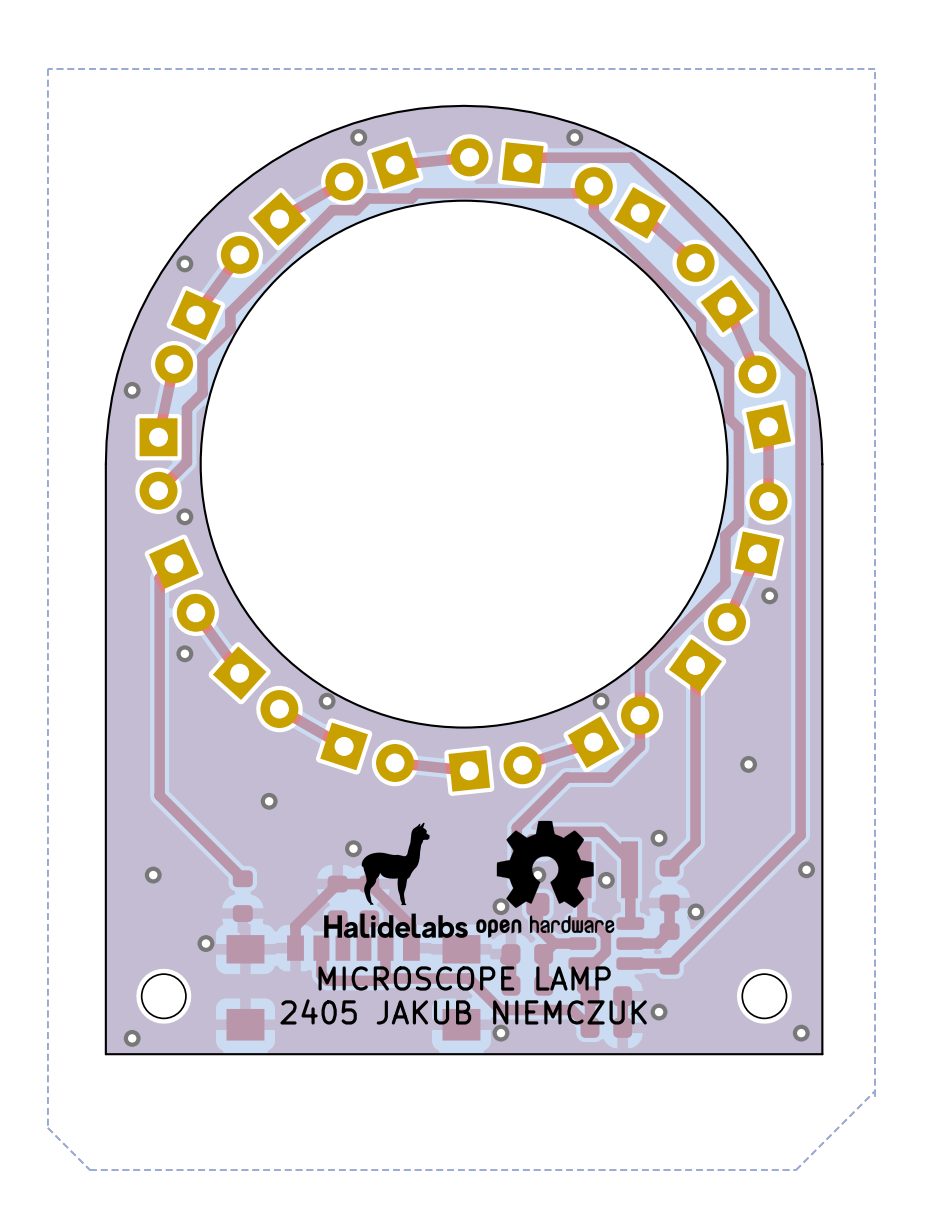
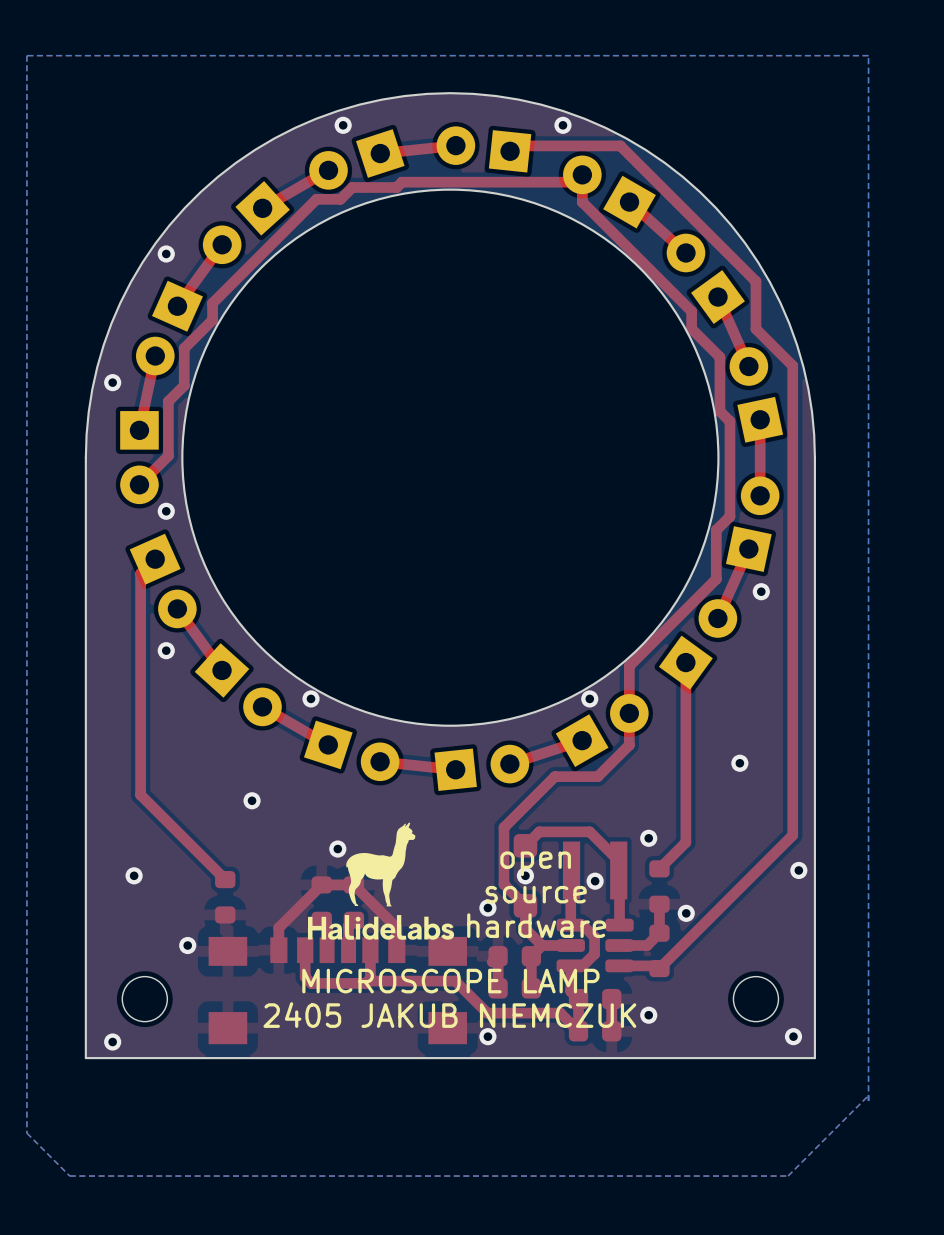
drawing: [476, 820, 615, 938] -> none
text: none -> open (535, 863)
text: none -> source (536, 894)
text: none -> hardware (536, 925)

